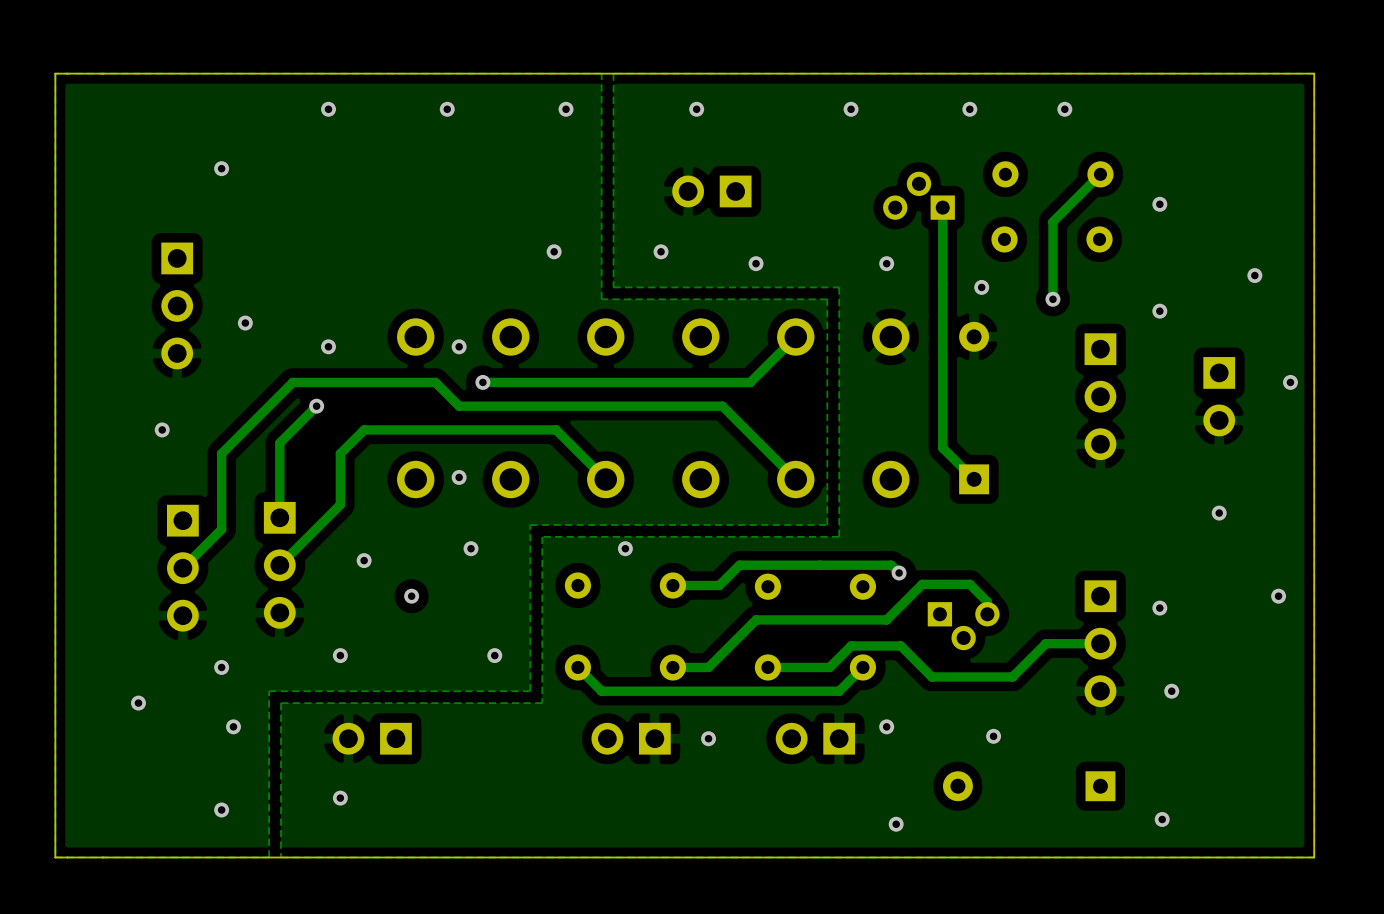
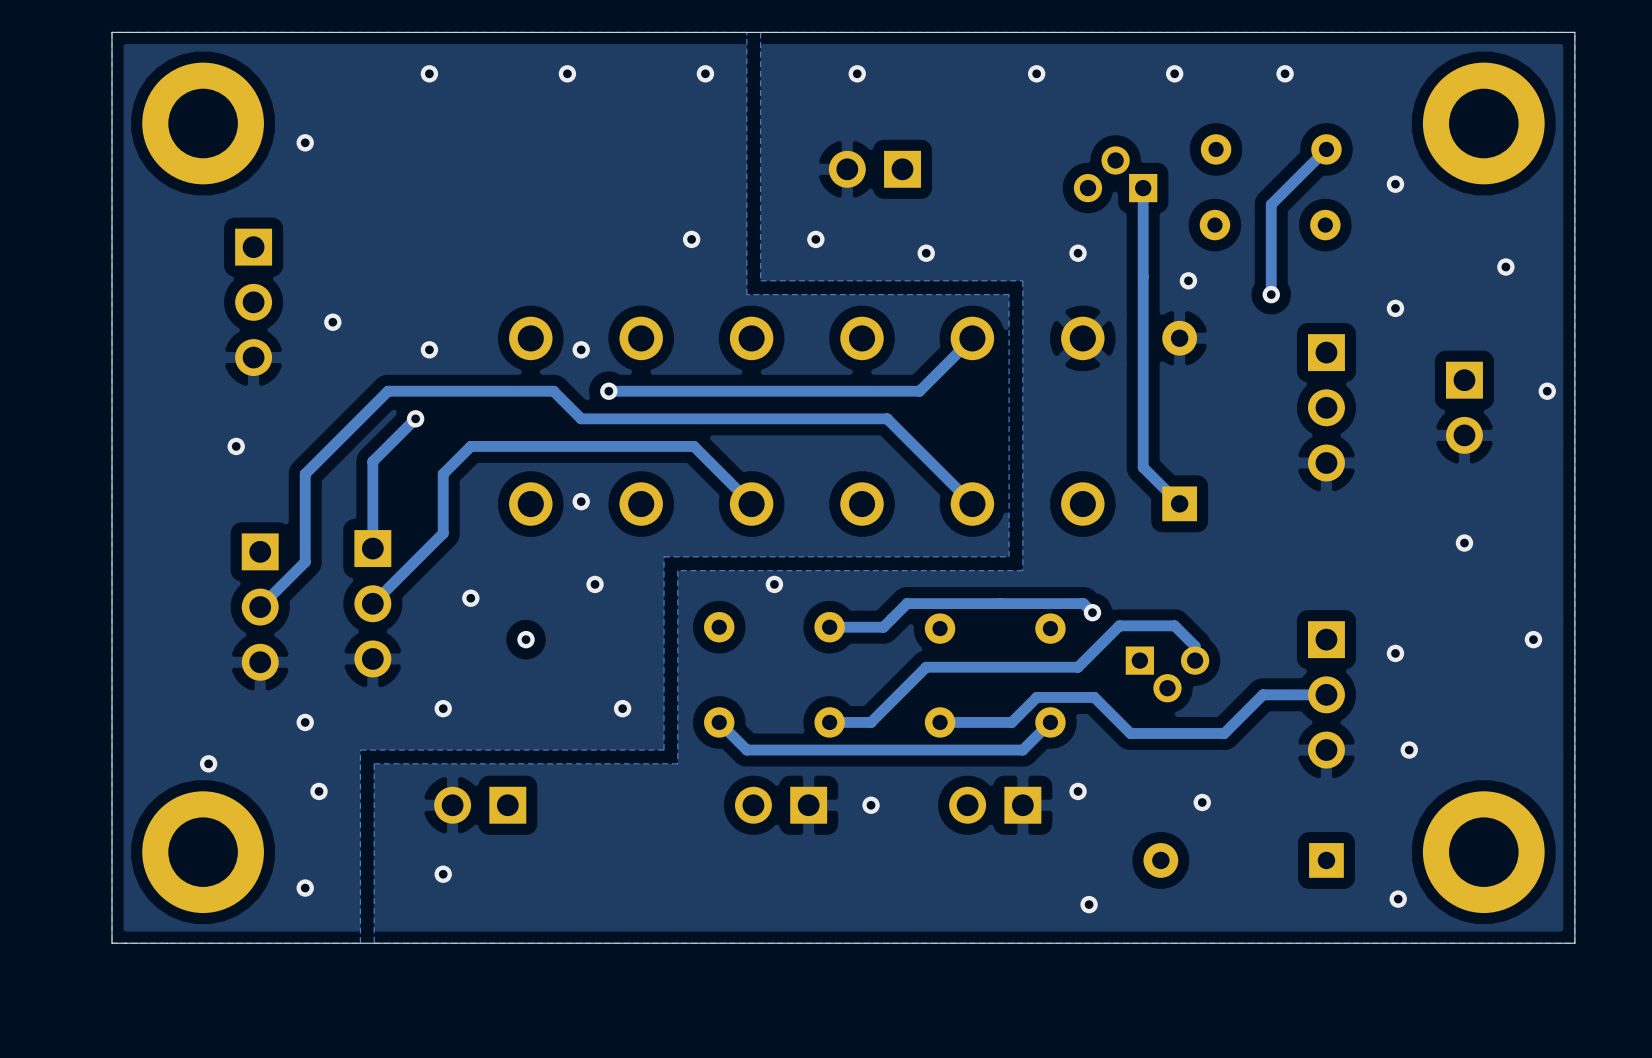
part: none -> (203, 123)
part: none -> (1483, 123)
part: none -> (203, 852)
part: none -> (1483, 852)

